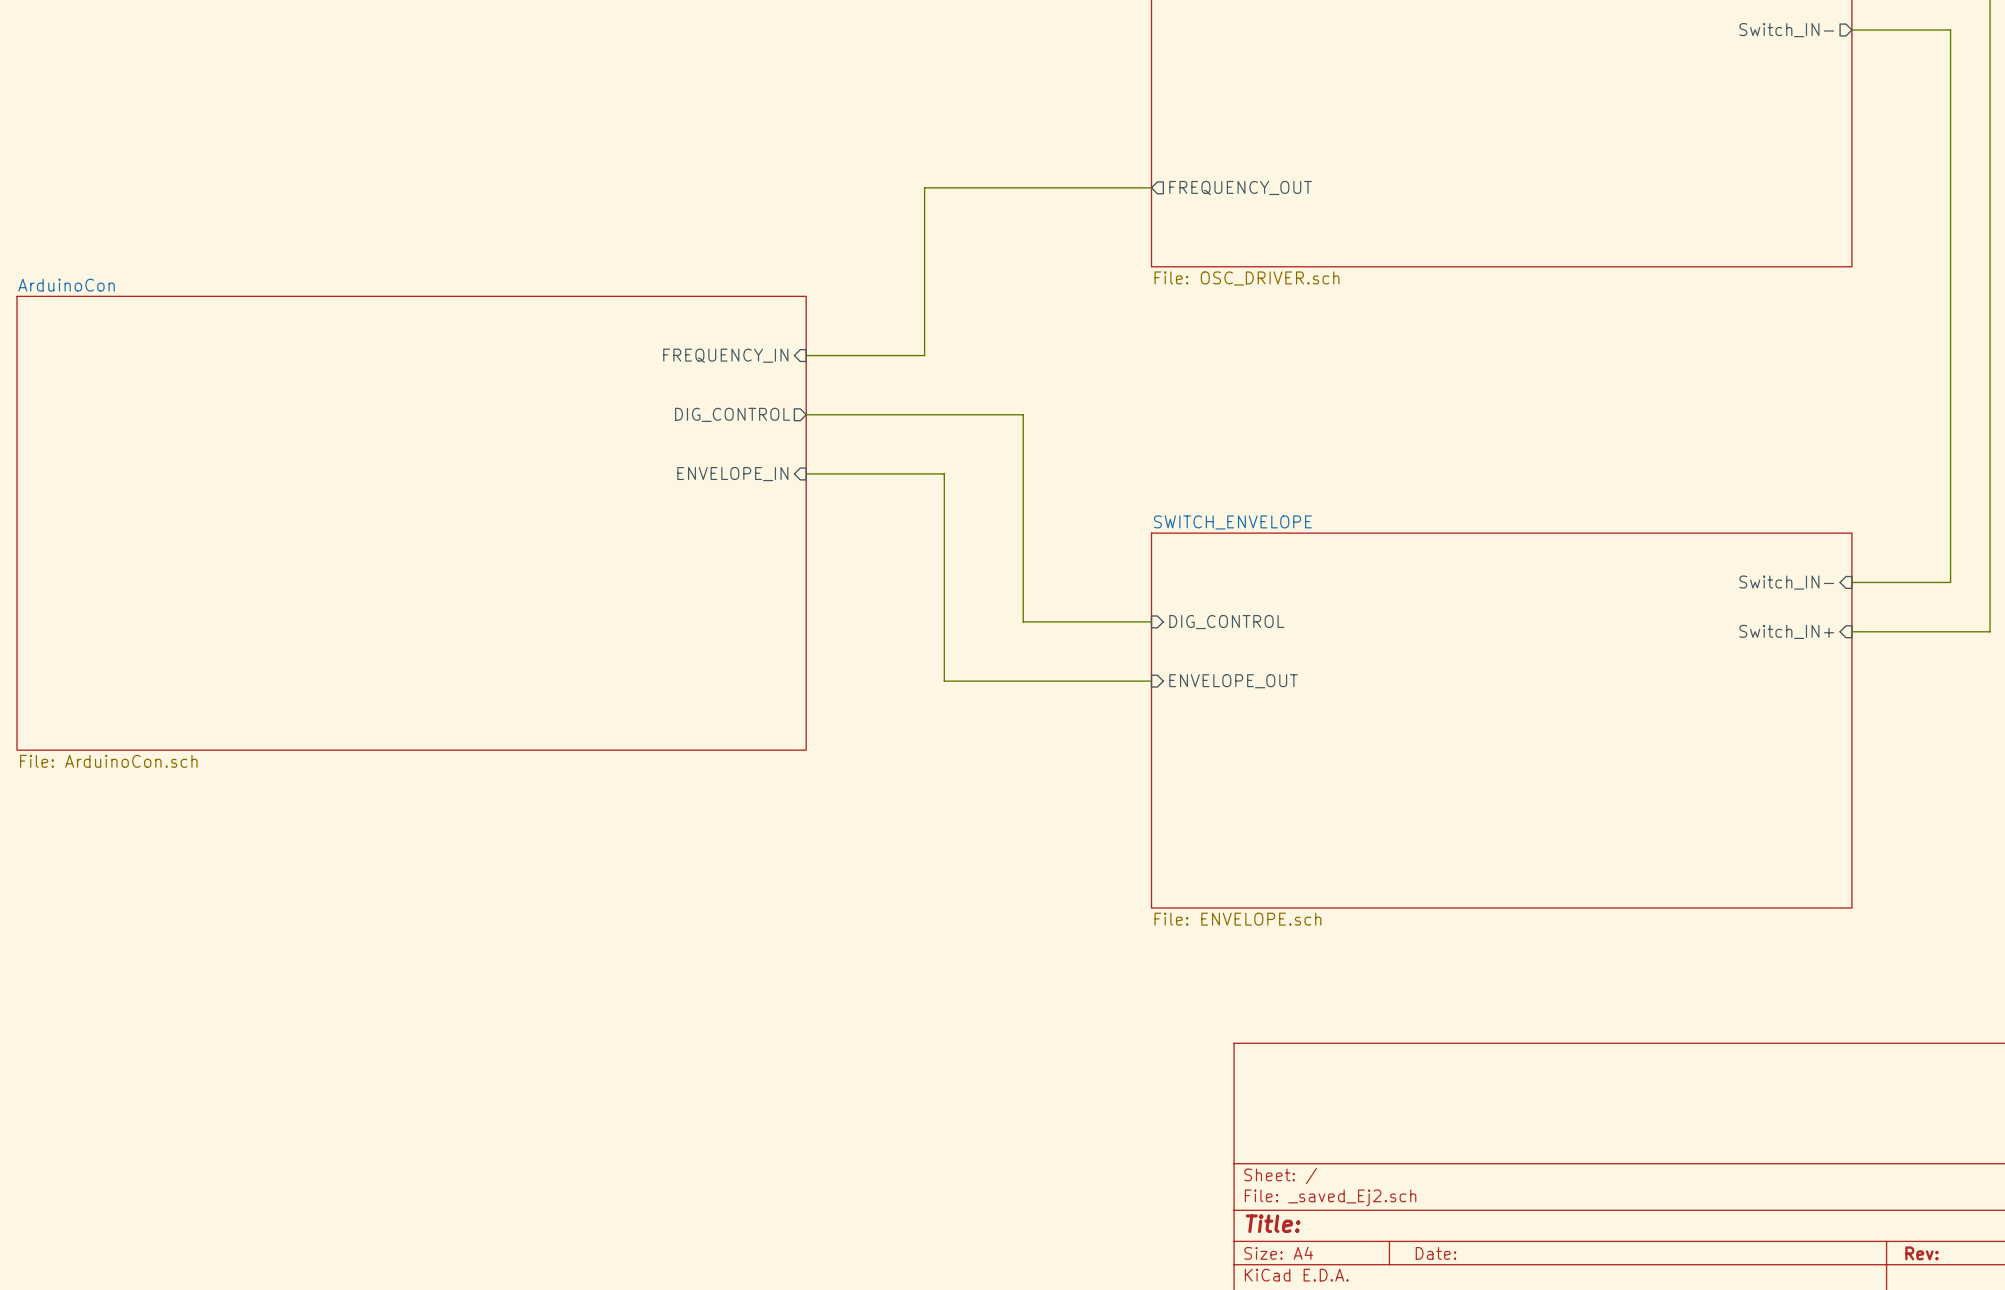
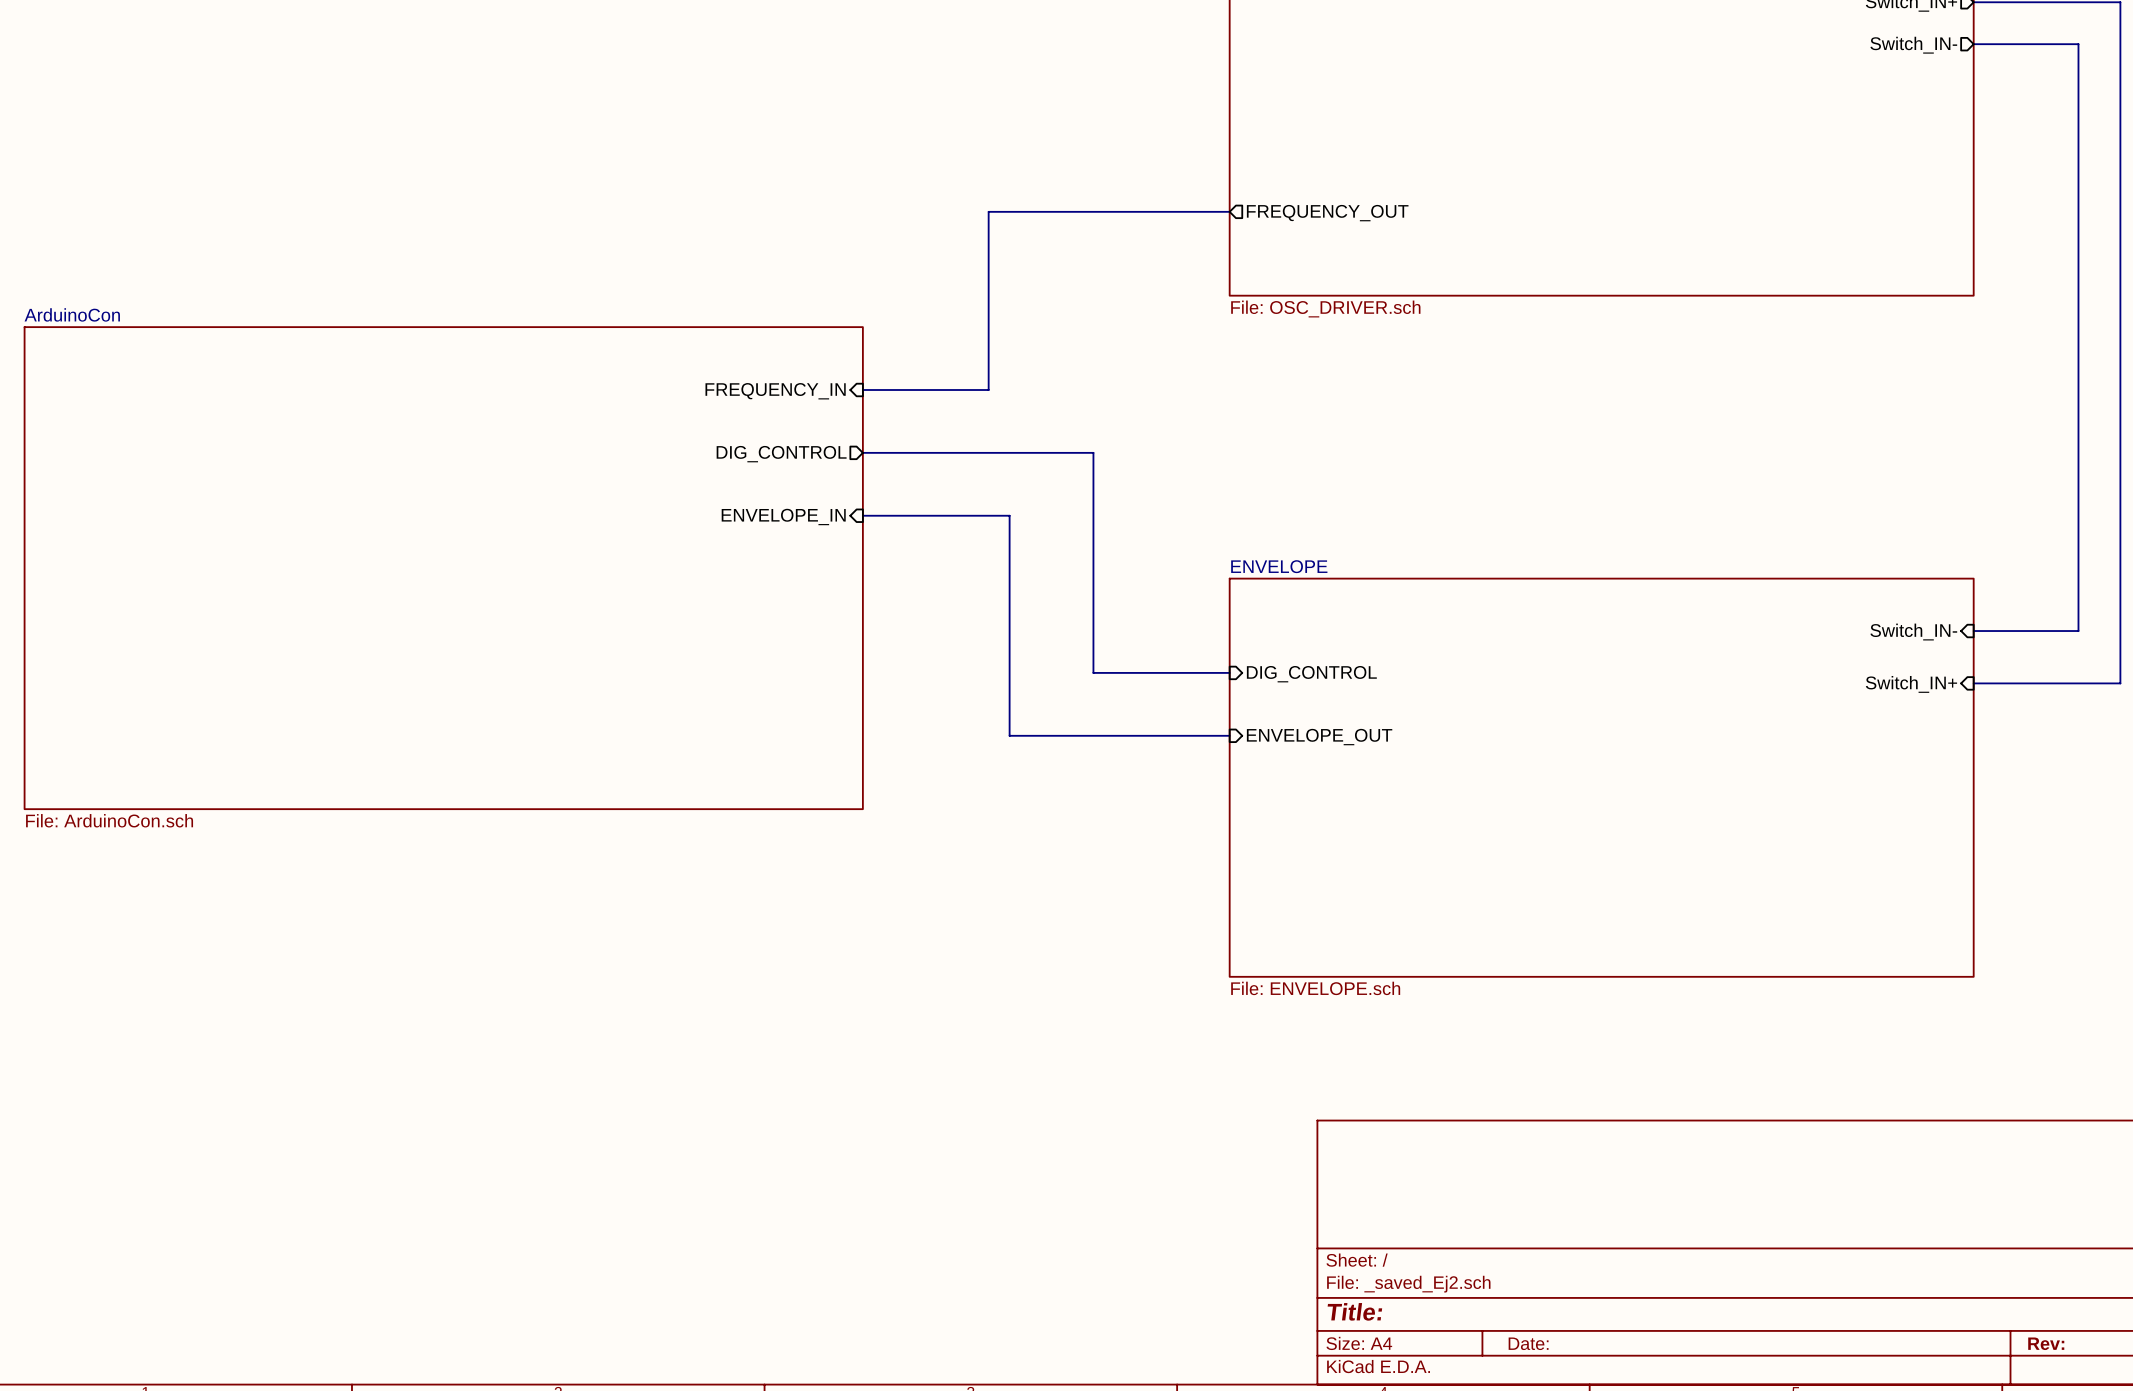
sheet SWITCH_ENVELOPE name: SWITCH_ENVELOPE (1232, 522) -> ENVELOPE (1279, 566)

